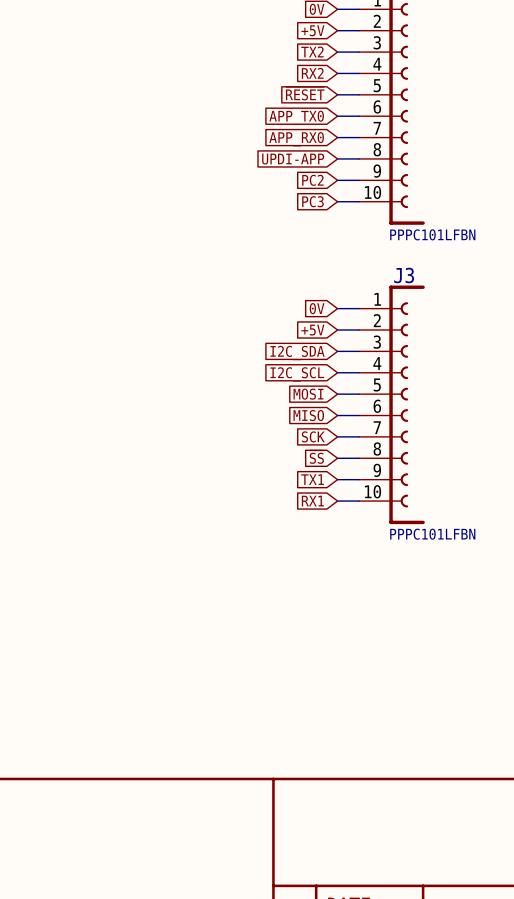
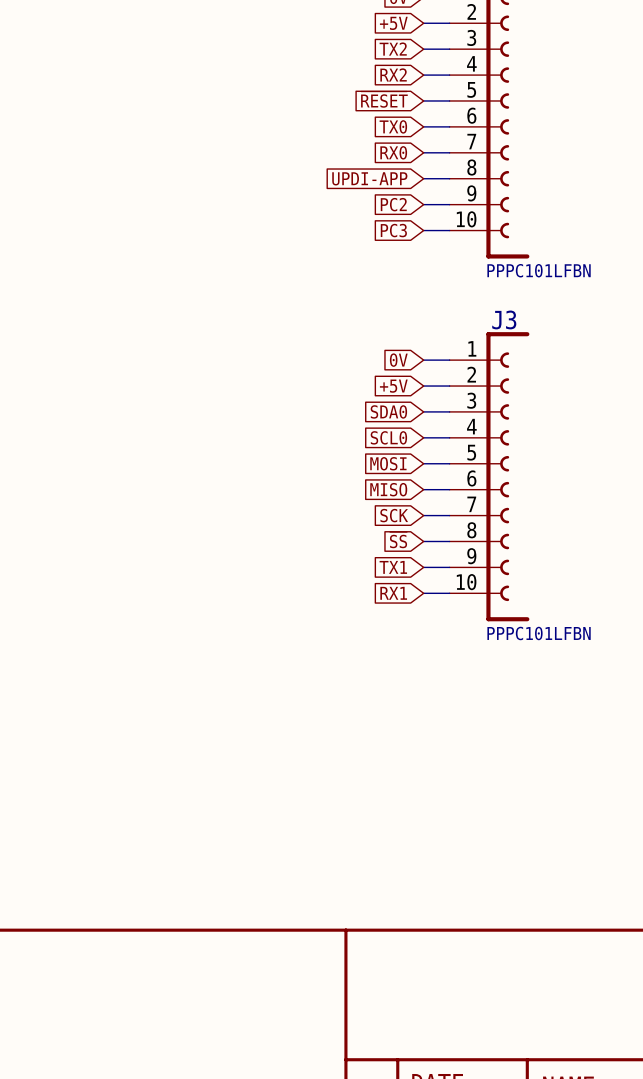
global label: APP_TX0 (296, 117) -> TX0 (393, 126)
global label: APP_RX0 (296, 139) -> RX0 (393, 152)
global label: I2C_SDA (297, 353) -> SDA0 (388, 411)
global label: I2C_SCL (297, 374) -> SCL0 (388, 437)

